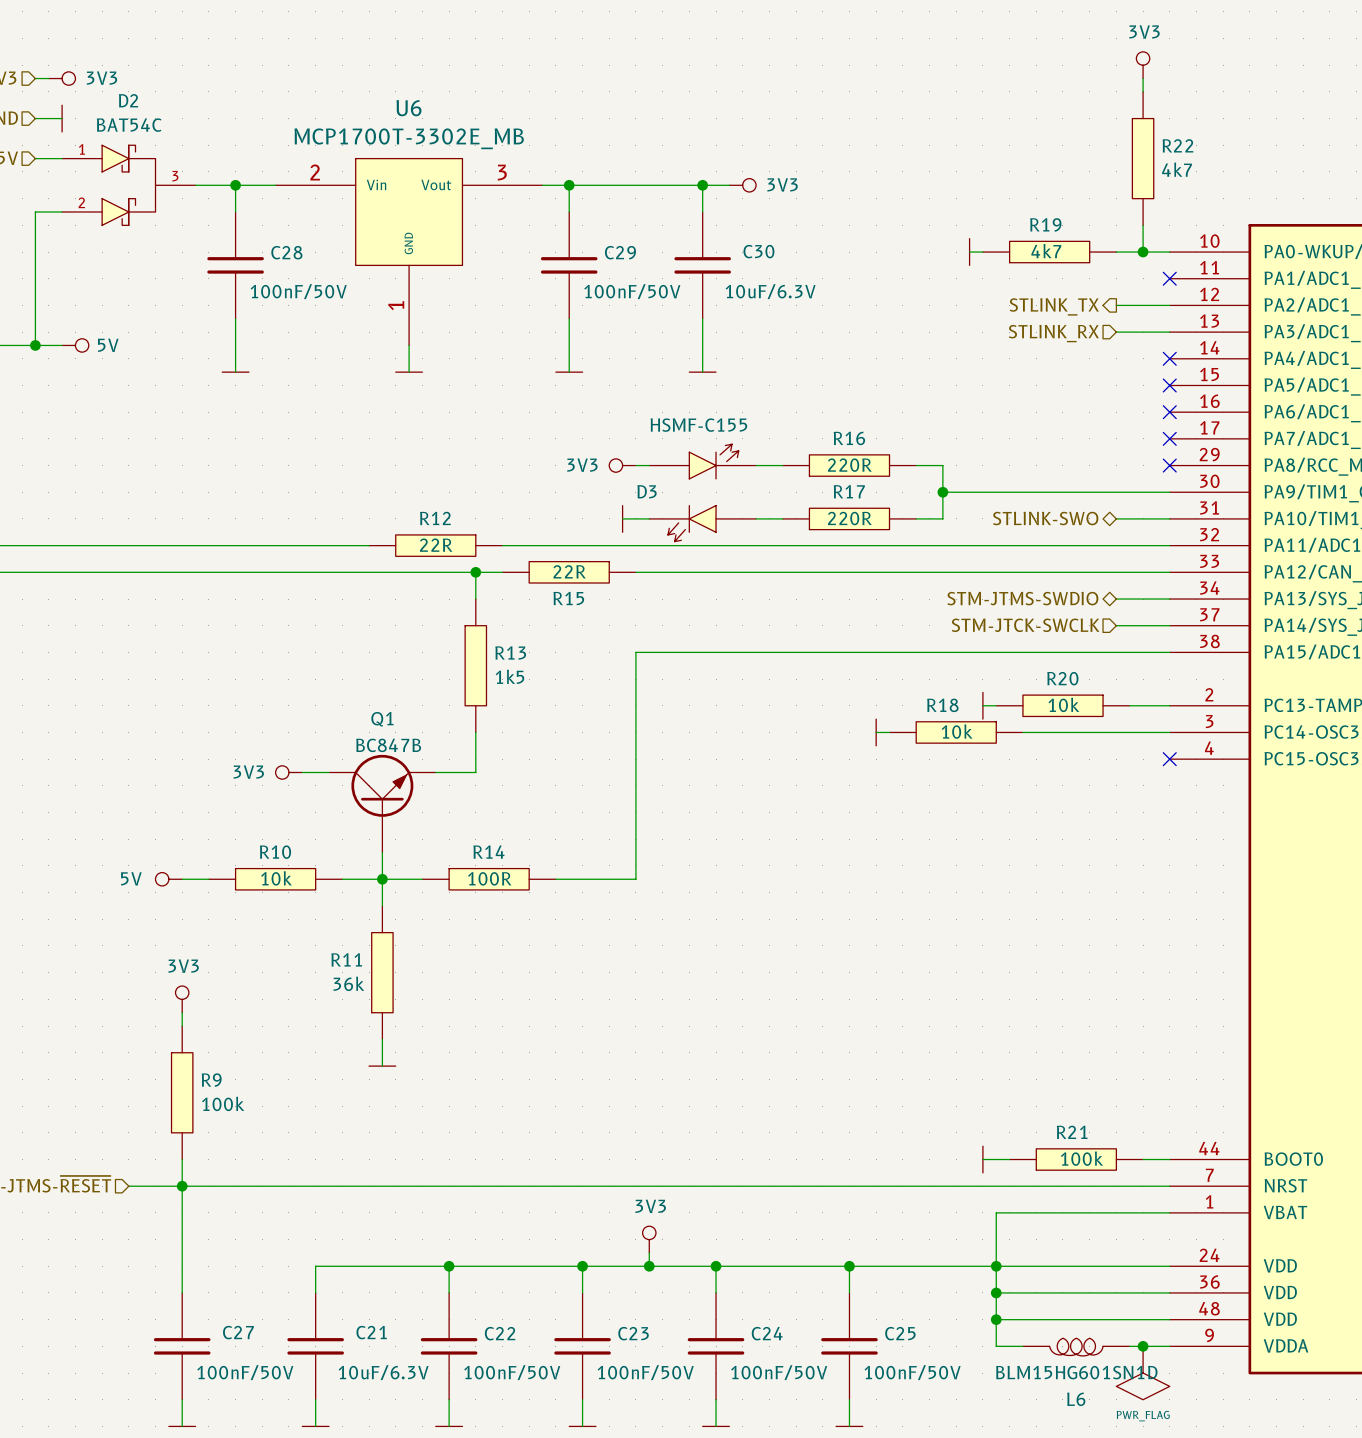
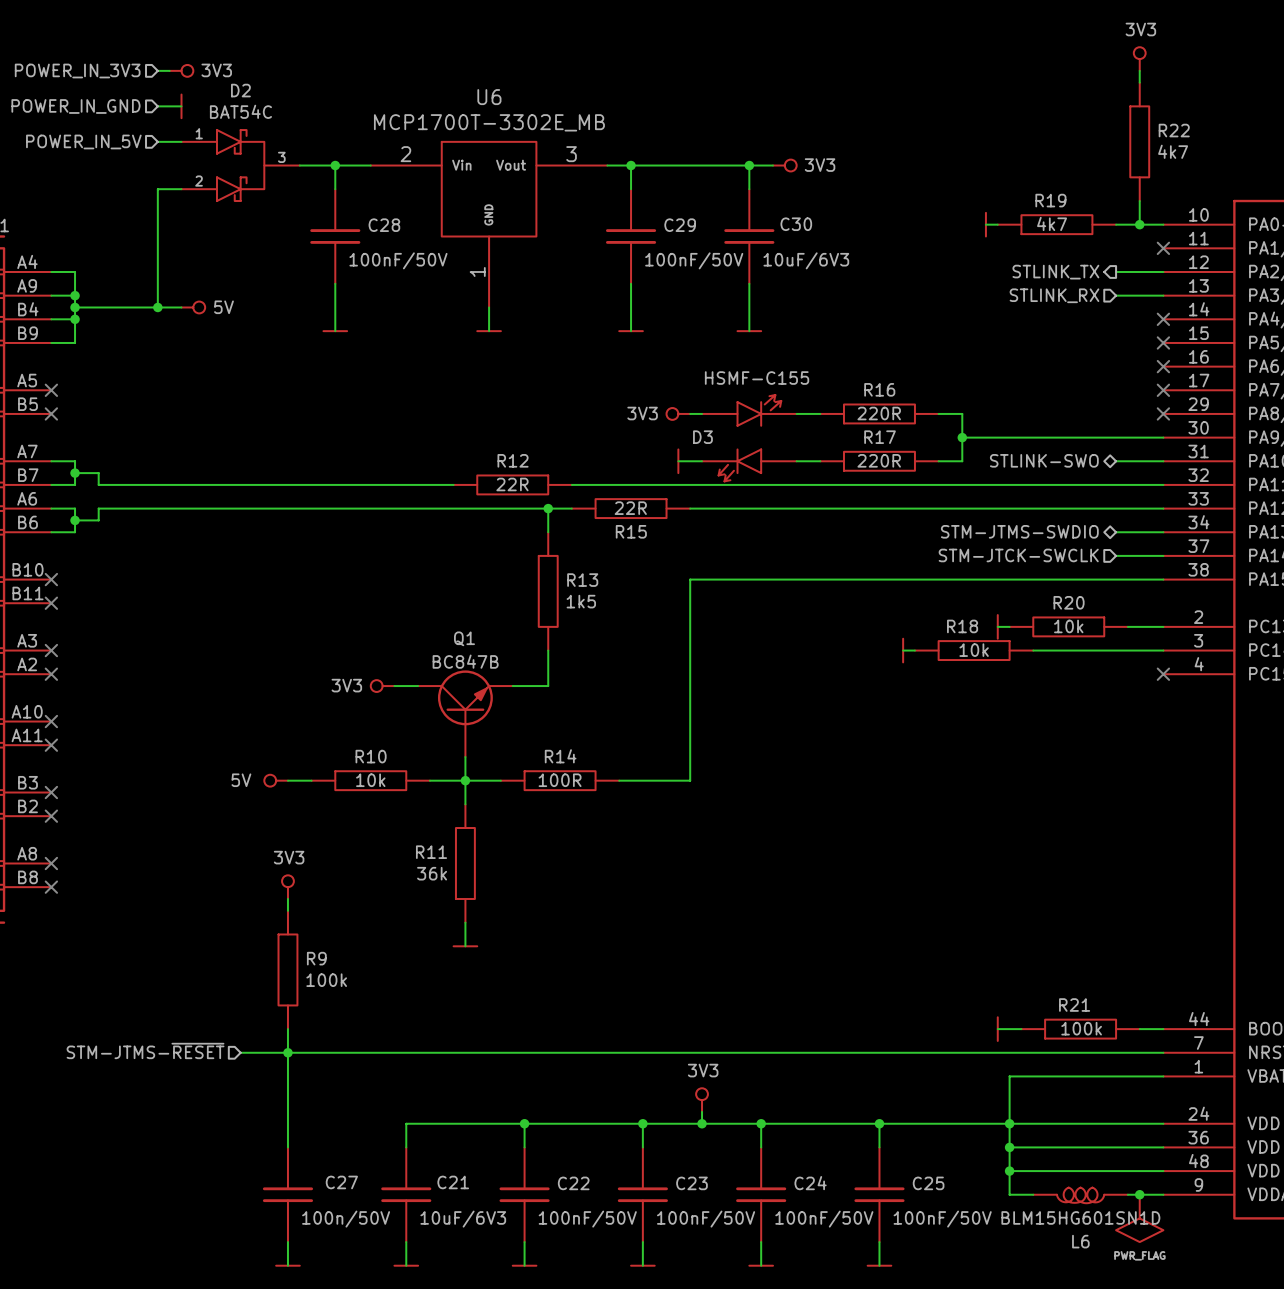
C30 value: 10uF/6.3V (770, 291) -> 10uF/6V3 (806, 260)
C27 value: 100nF/50V (245, 1372) -> 100n/50V (346, 1219)
C21 value: 10uF/6.3V (383, 1372) -> 10uF/6V3 (463, 1219)

